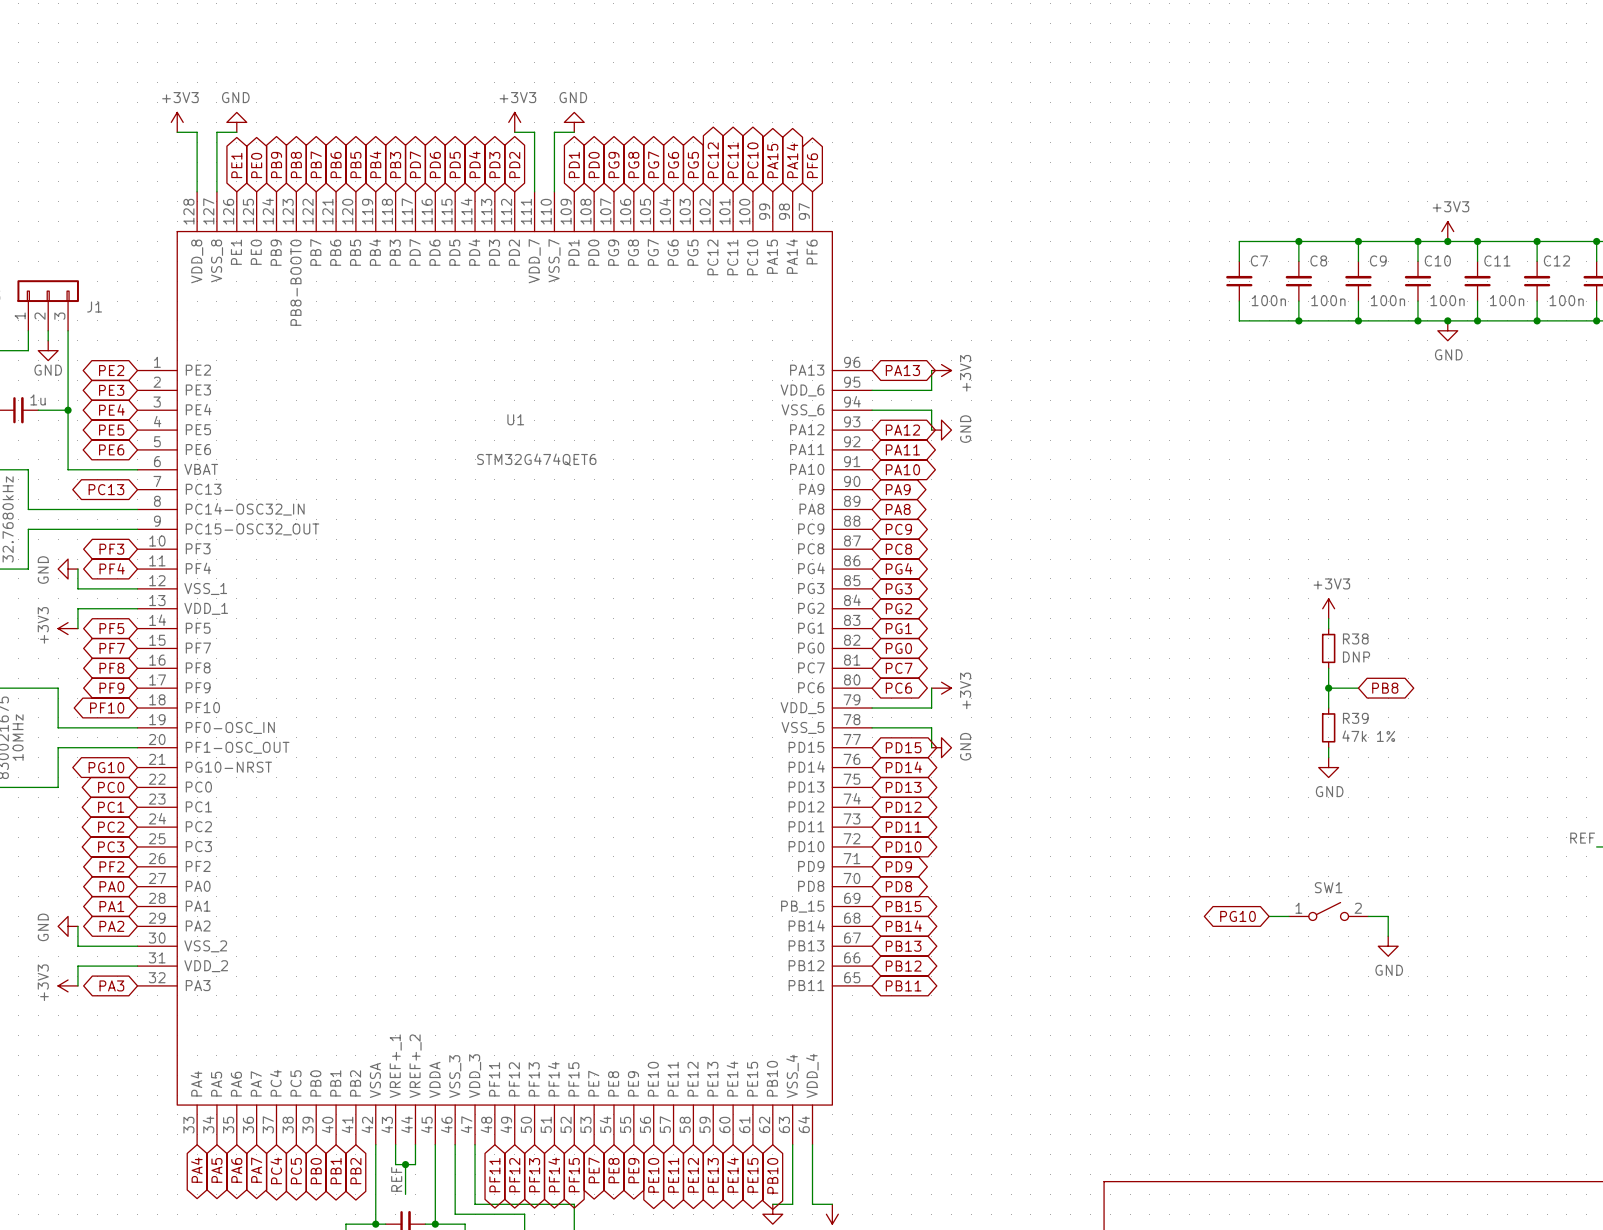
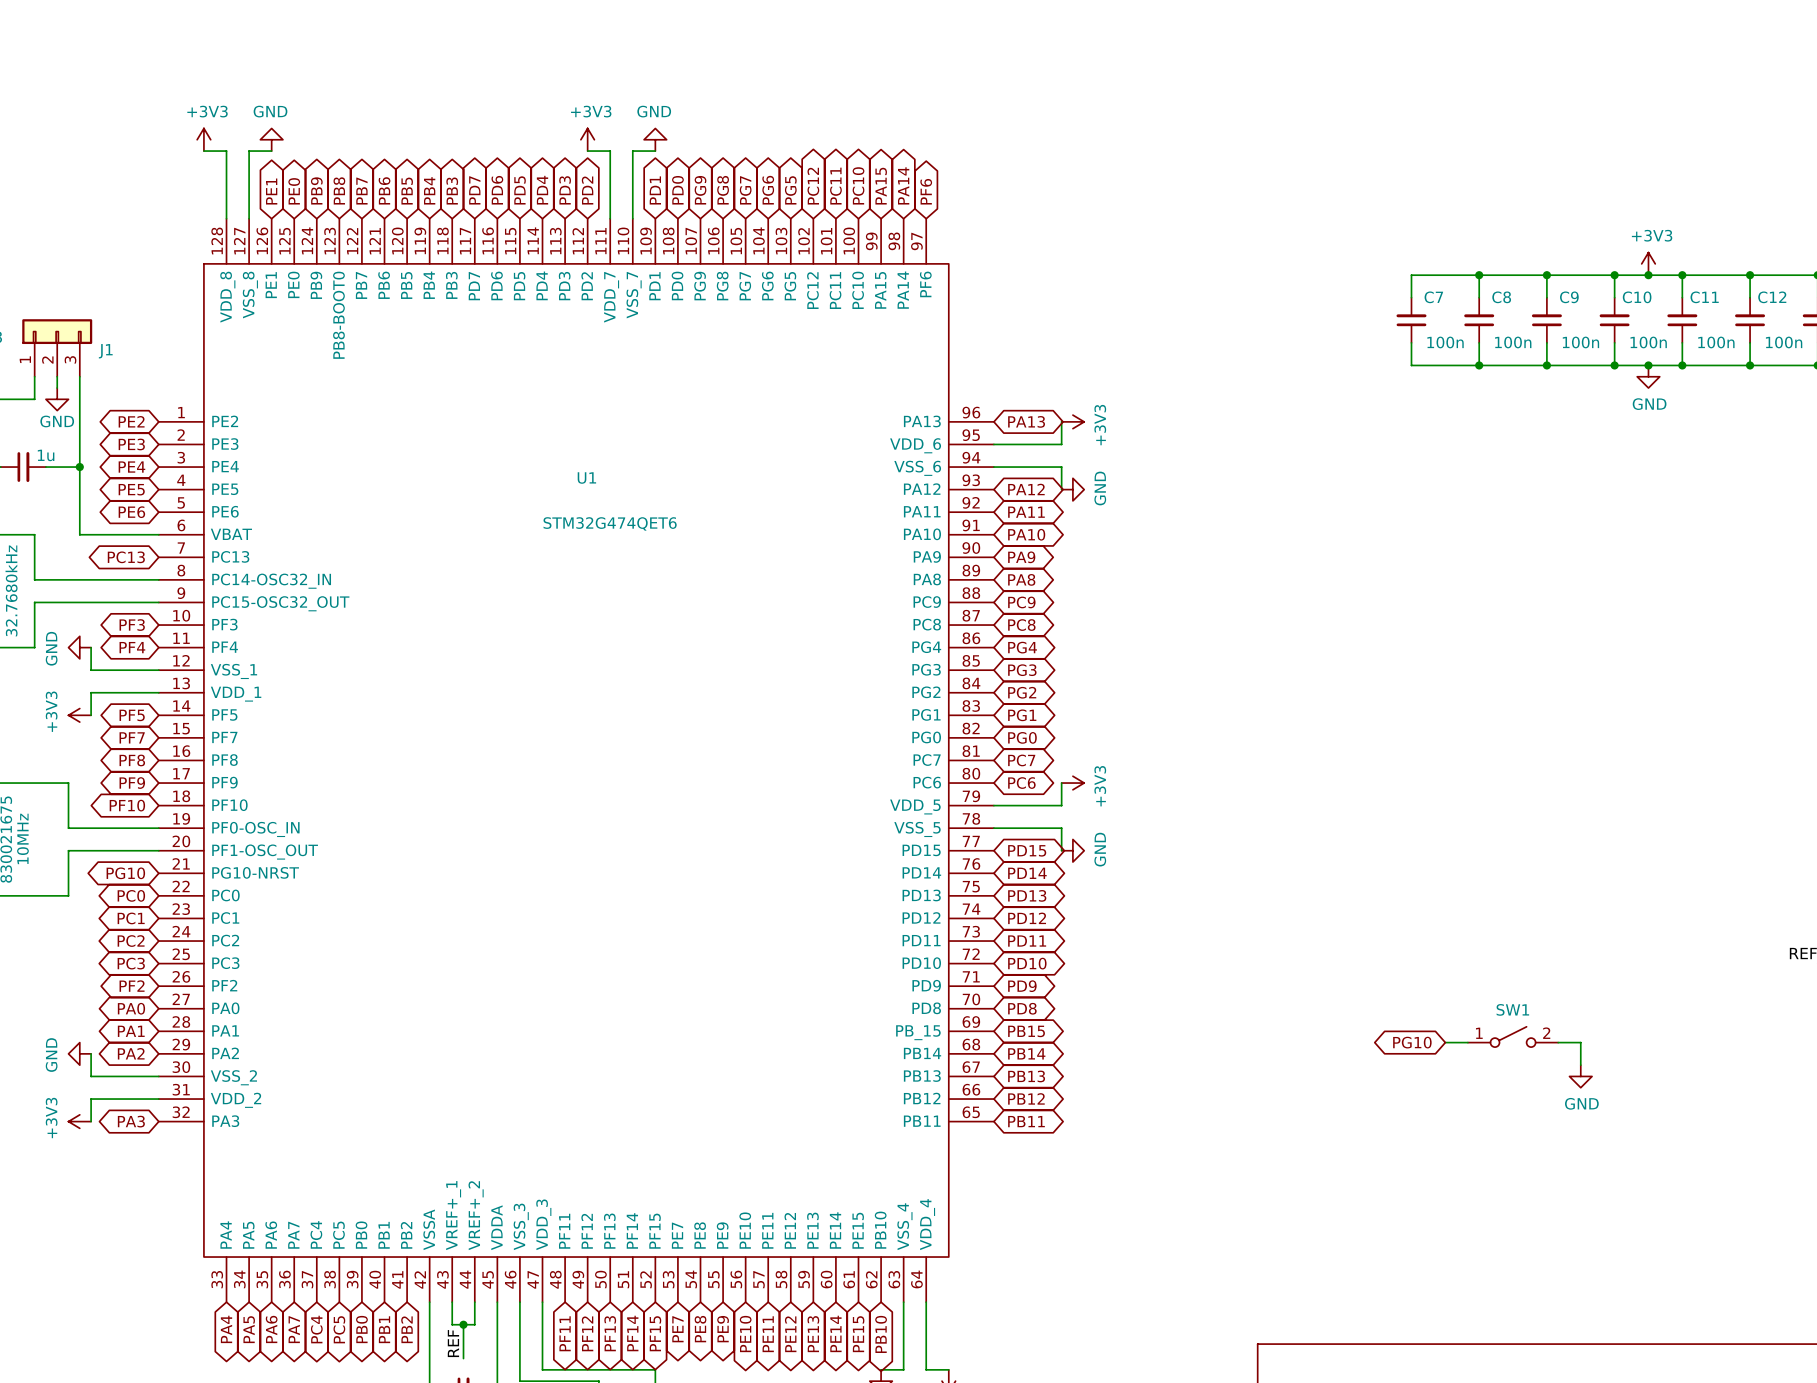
power symbol: +3V3 (1328, 608) -> none
wire: (1328, 618) (1328, 628) -> none
R38: DNP (1328, 648) -> none
wire: (1328, 668) (1328, 708) -> none
wire: (1328, 688) (1358, 688) -> none
junction: (1328, 688) -> none
global label: PB8 (1385, 688) -> none
R39: 47k 1% (1328, 727) -> none
wire: (1328, 747) (1328, 757) -> none
power symbol: GND (1328, 767) -> none

